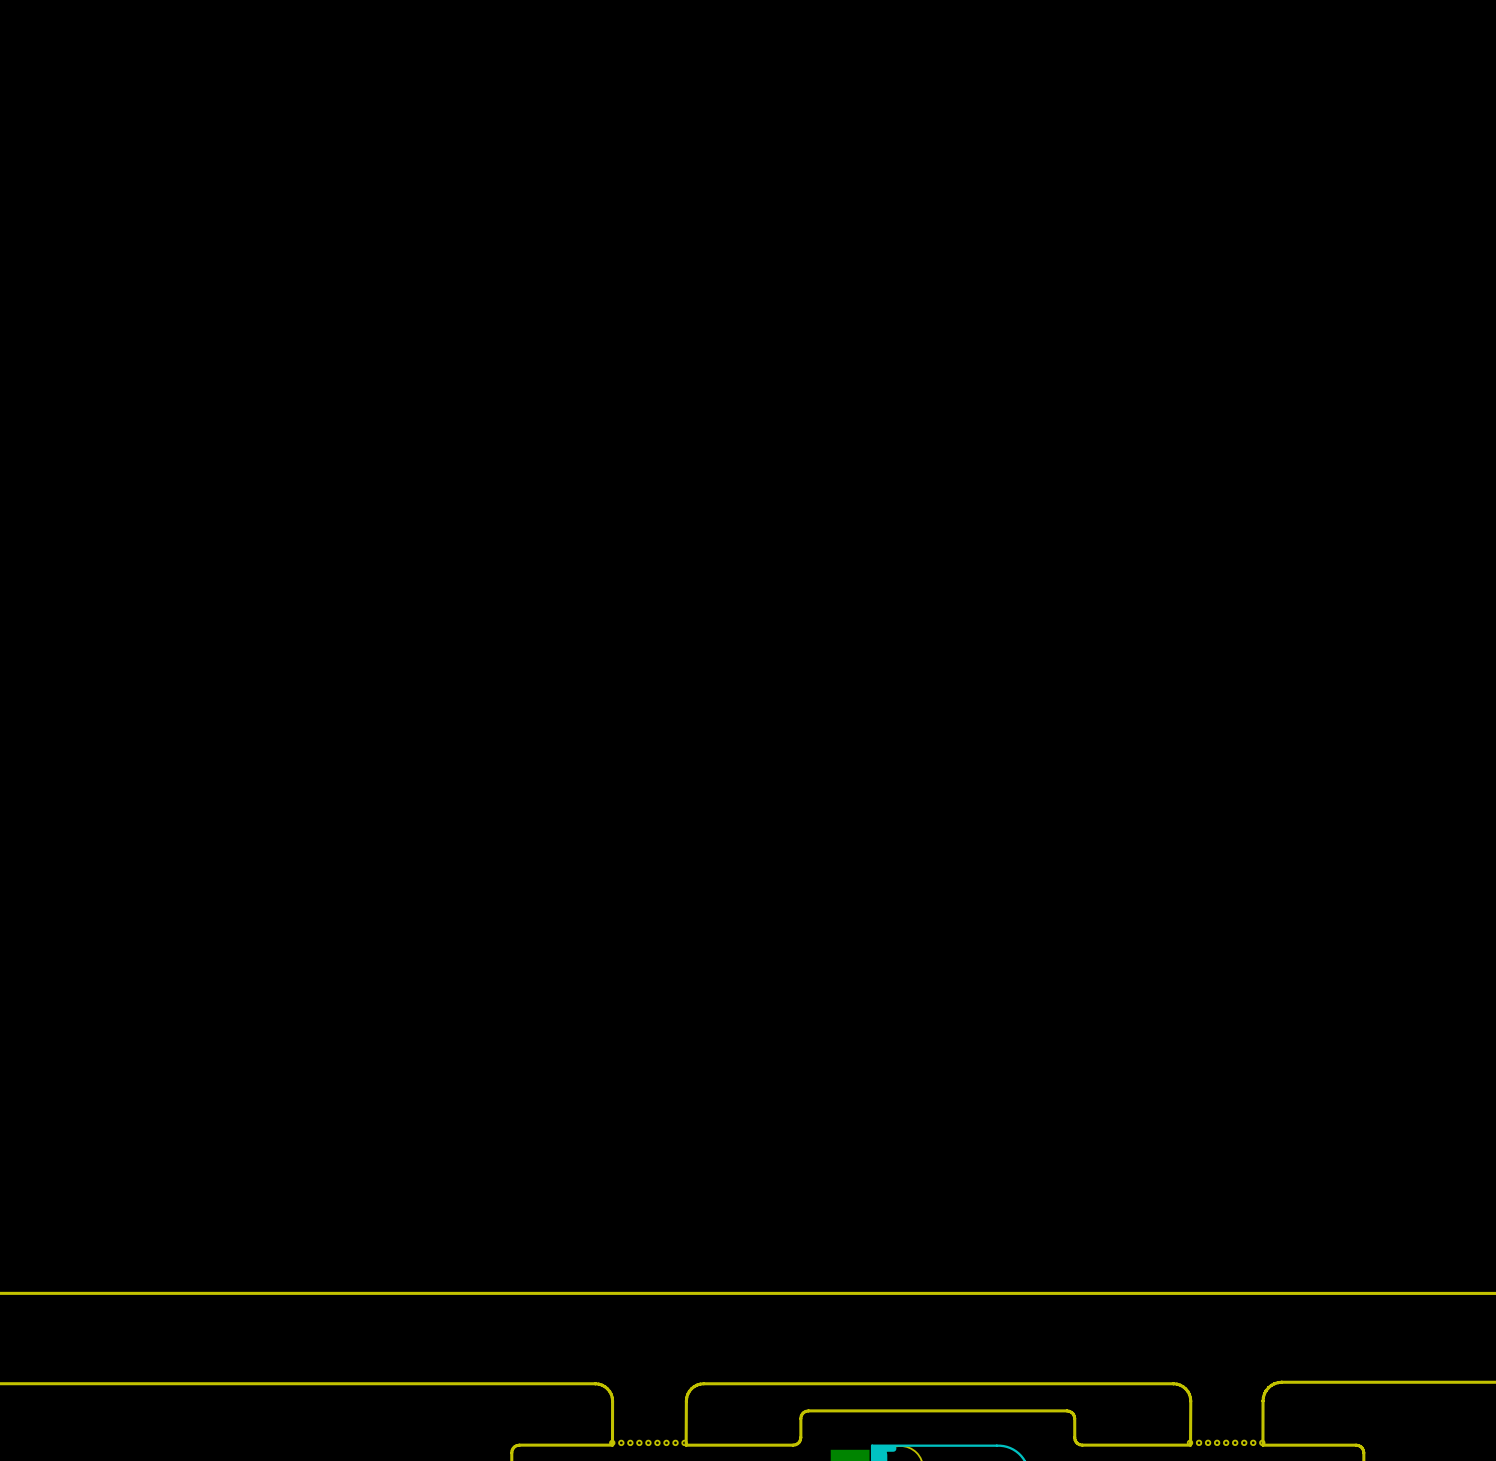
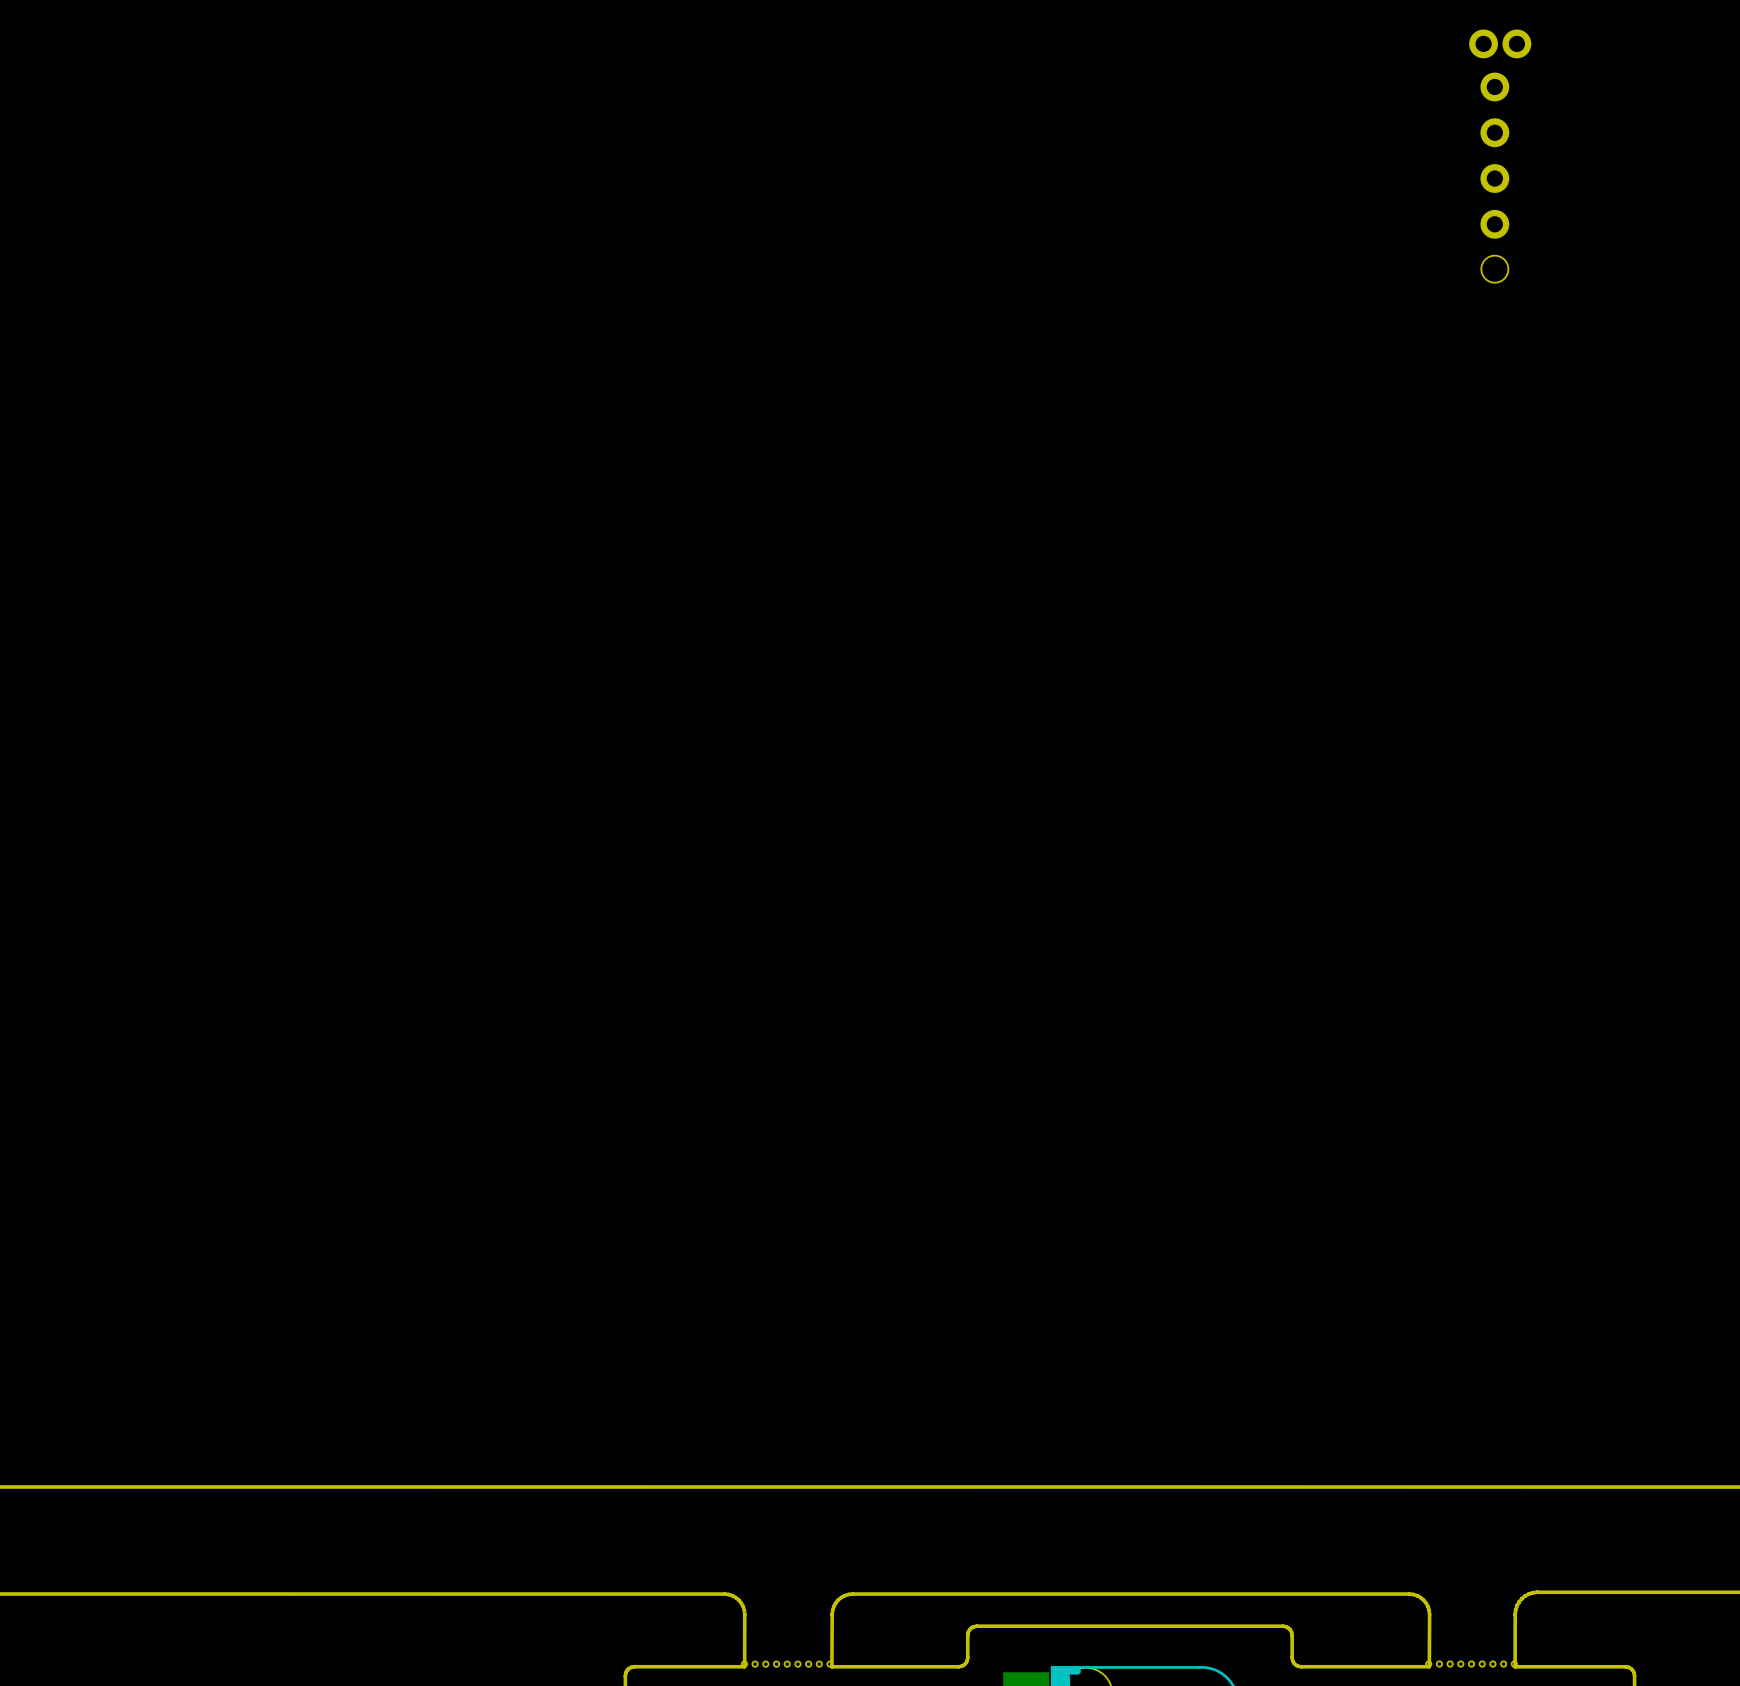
part: none -> (1500, 156)

